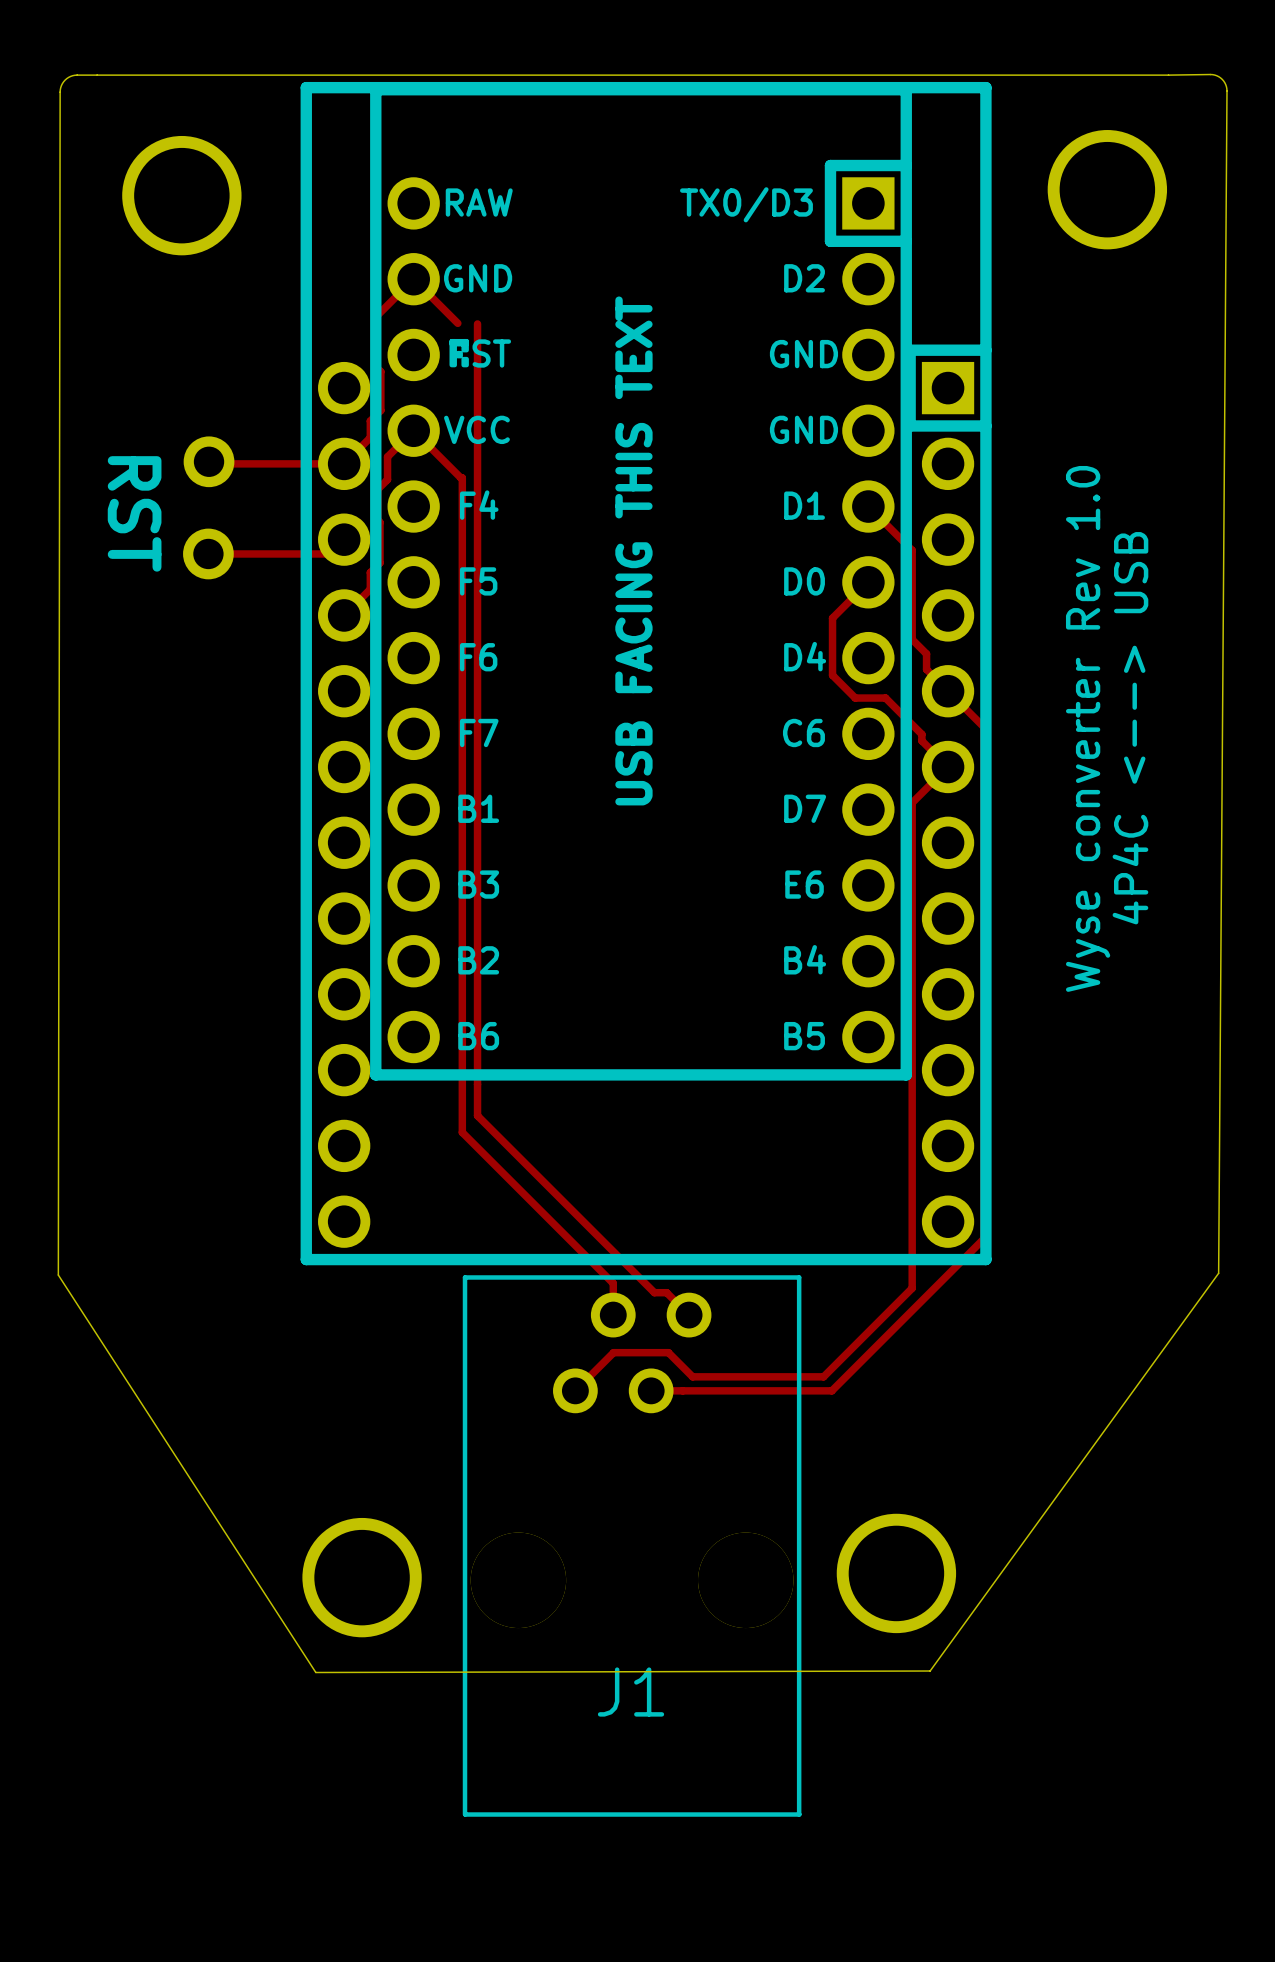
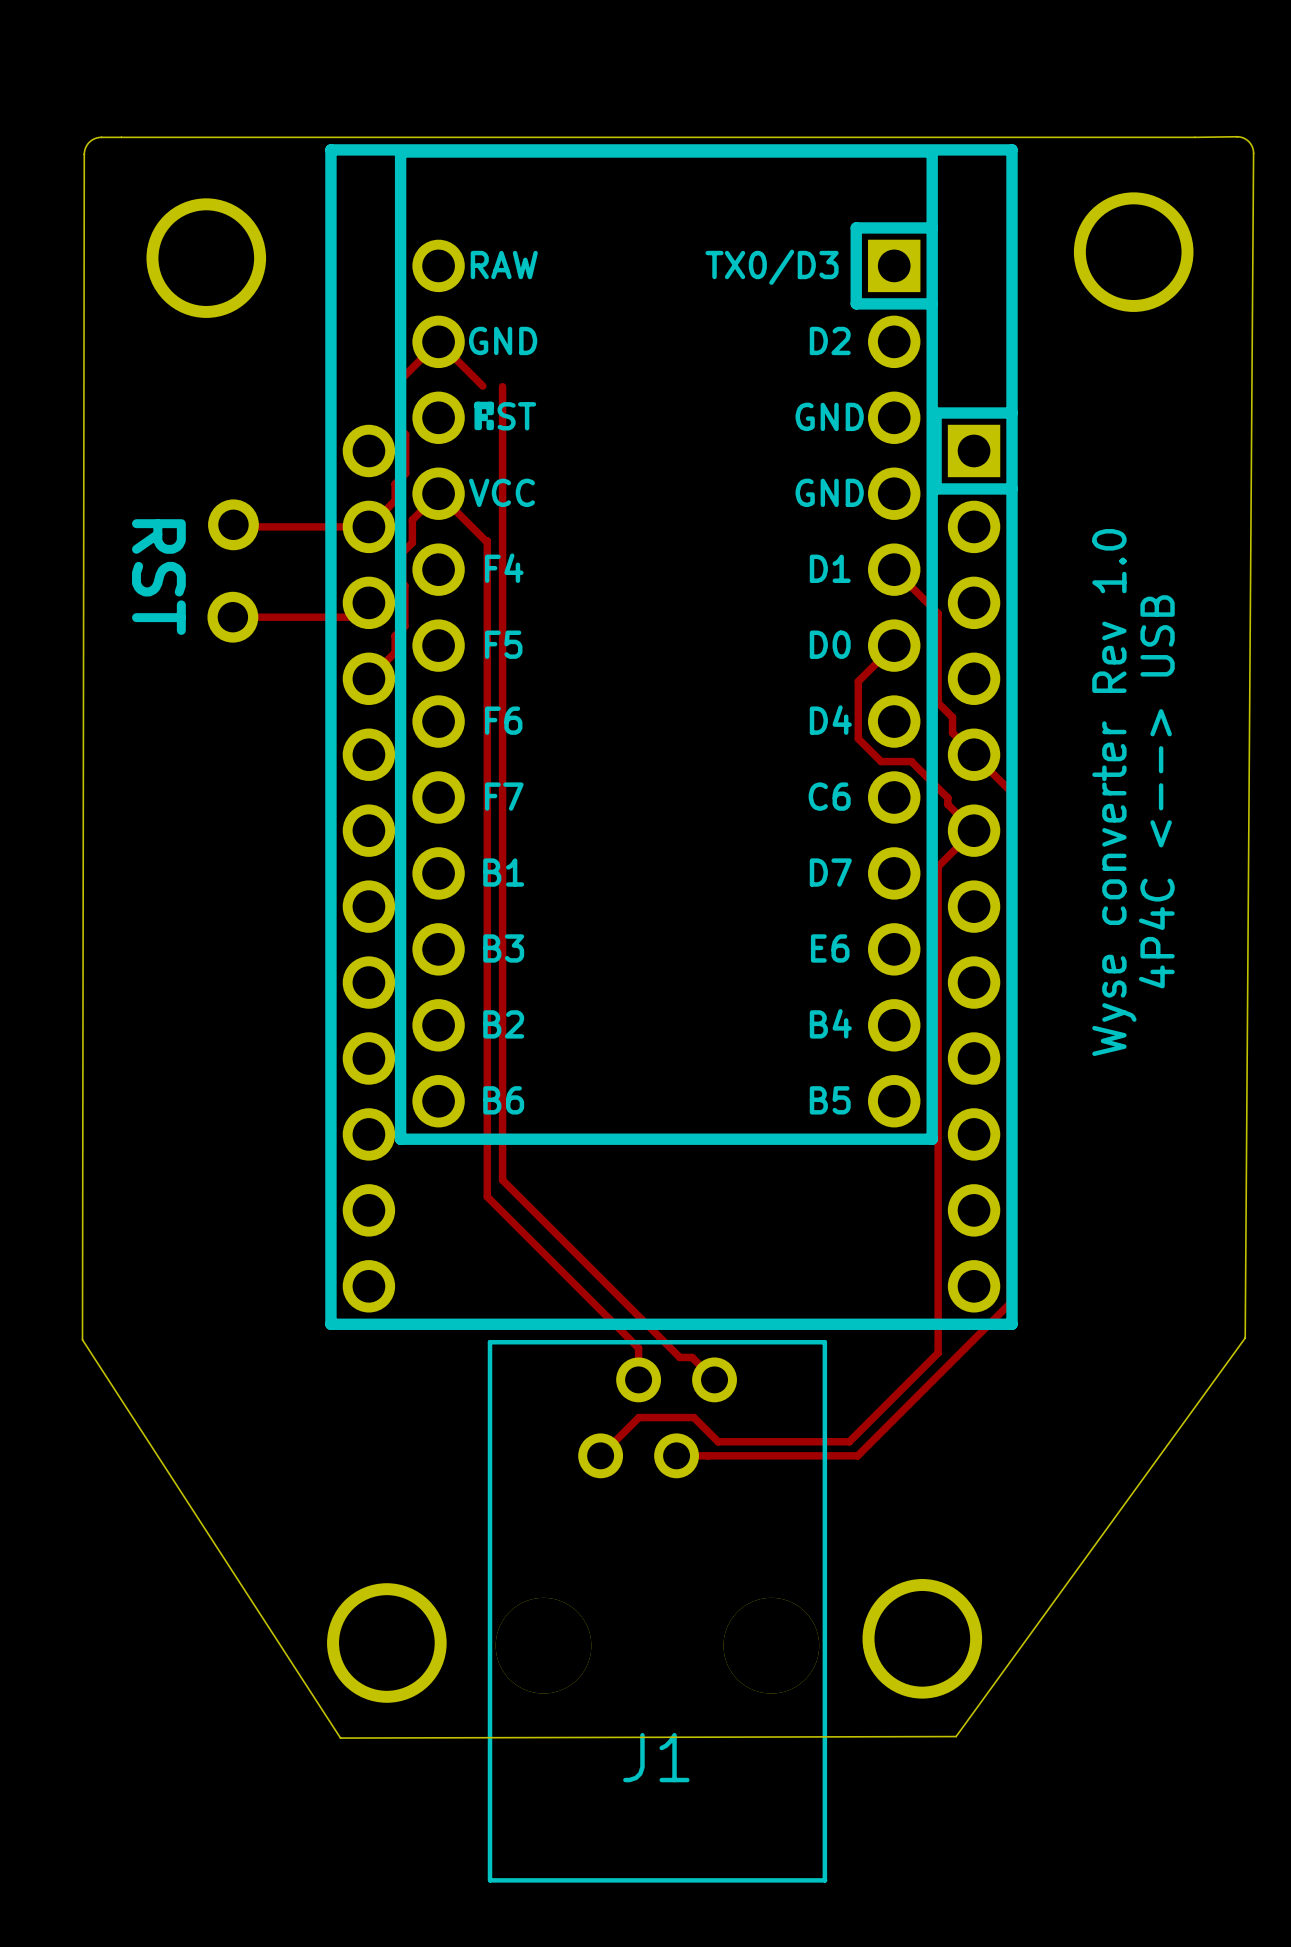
text: USB FACING THIS TEXT (633, 550) -> none

